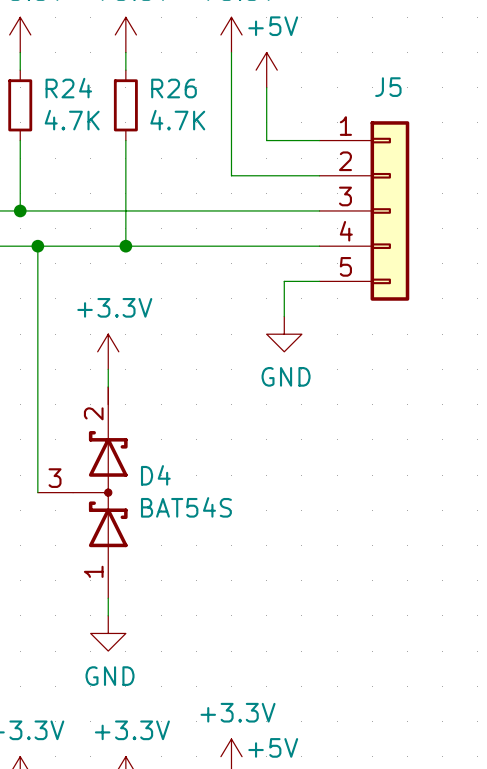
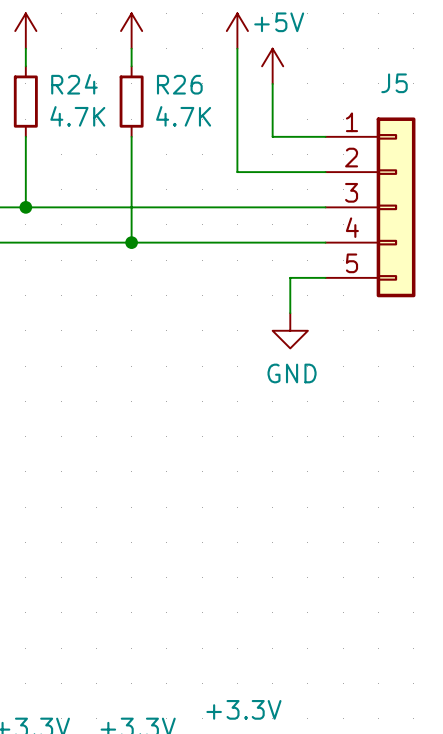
wire: (37, 246) (37, 492) -> none
junction: (37, 246) -> none
power symbol: +3.3V (108, 351) -> none
wire: (108, 369) (108, 387) -> none
D4: BAT54S (82, 492) -> none
wire: (108, 598) (108, 615) -> none
power symbol: GND (108, 633) -> none

